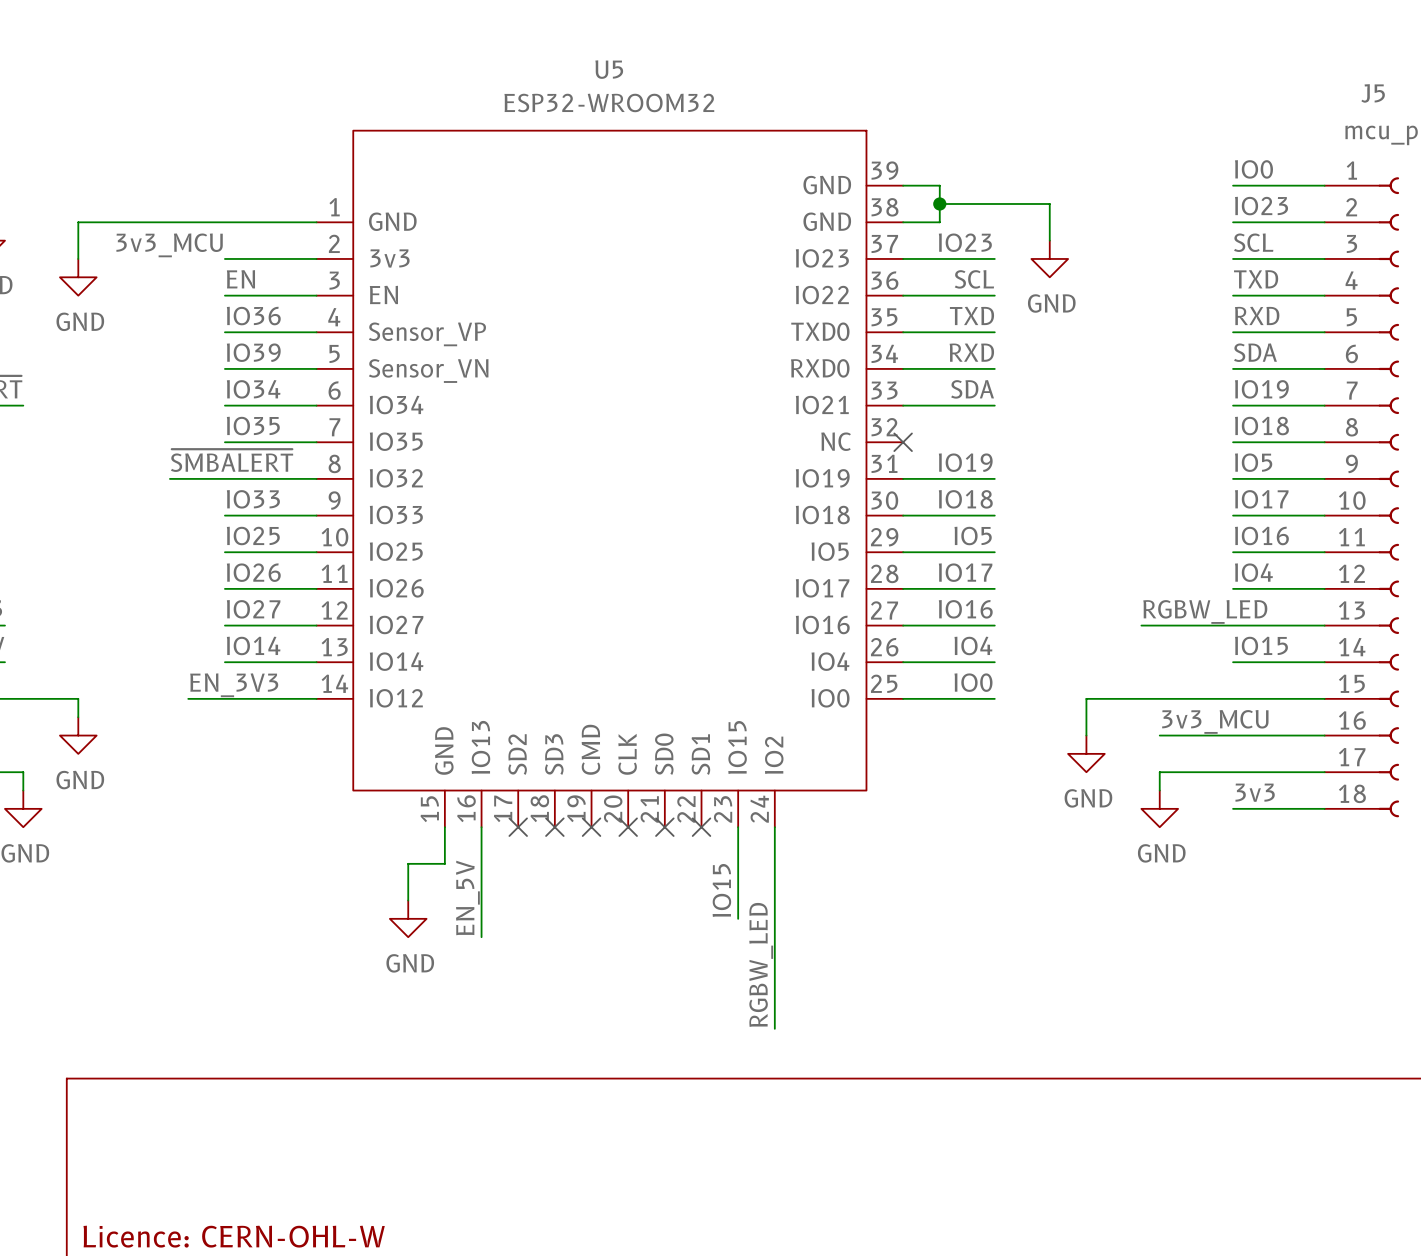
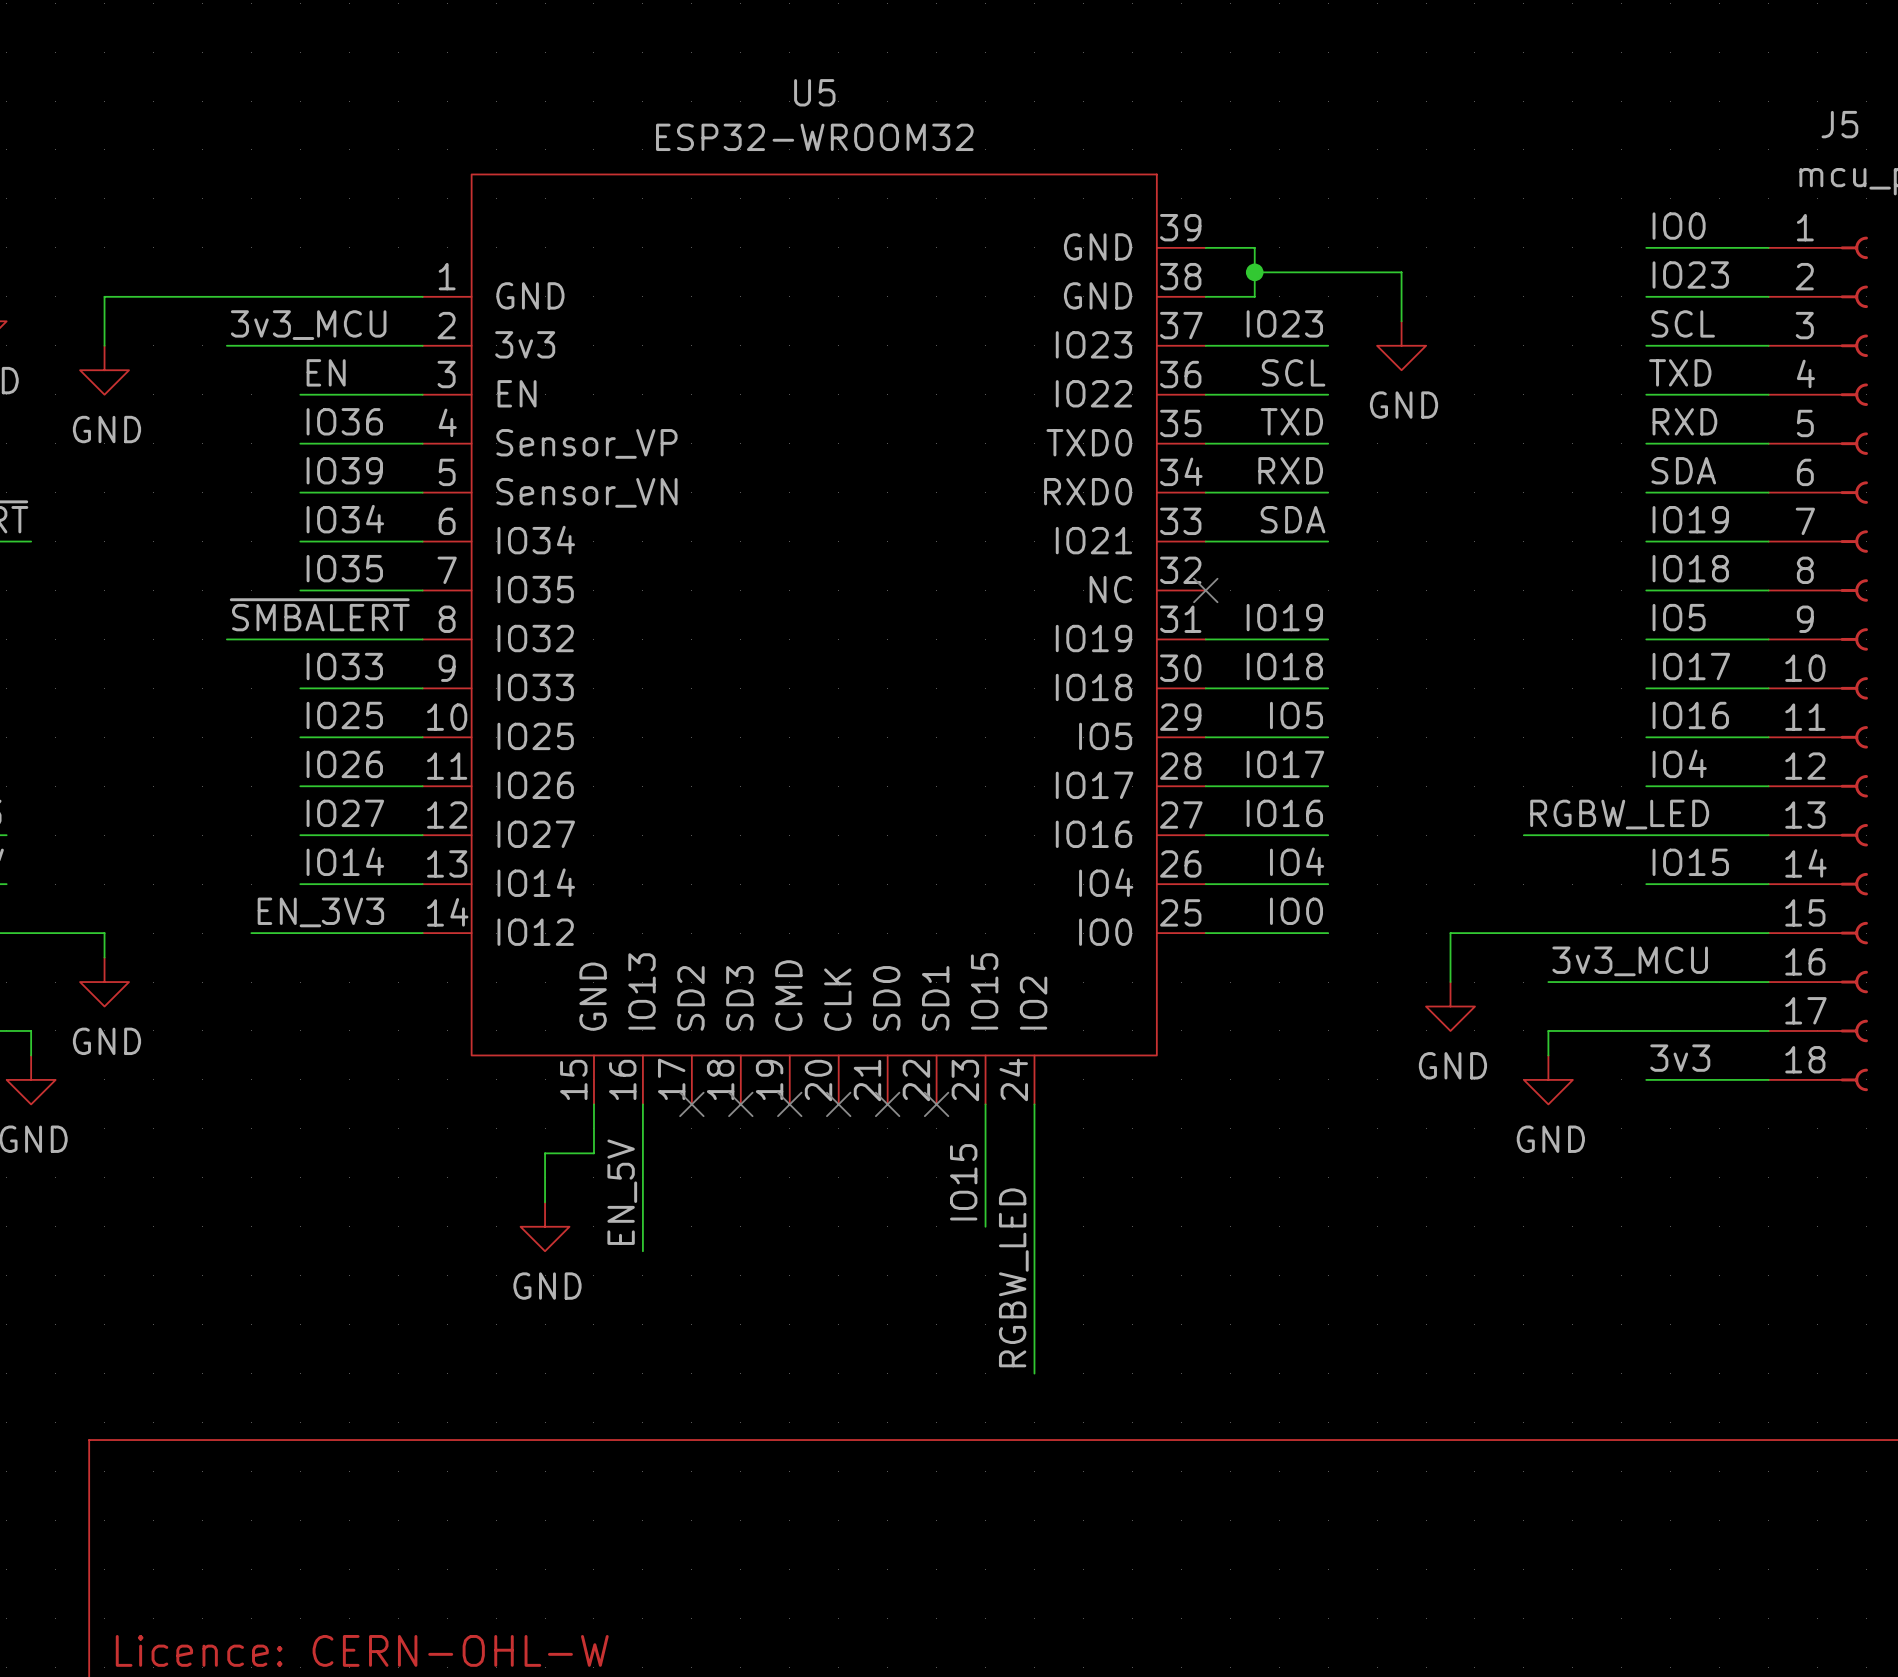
label position: 3v3_MCU (169, 245) -> 3v3_MCU (308, 325)
wire: none -> (226, 345) (300, 345)

